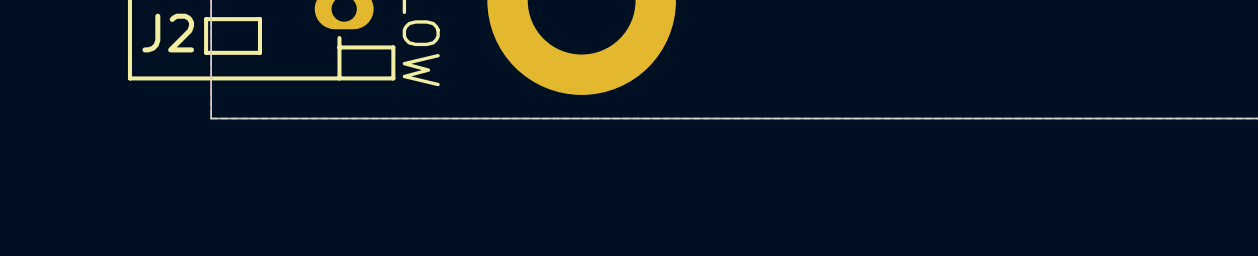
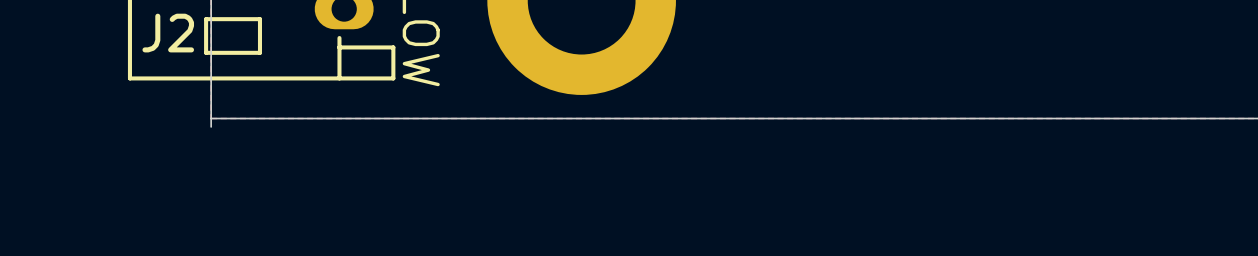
board edge: none -> (211, 118) (211, 126)

